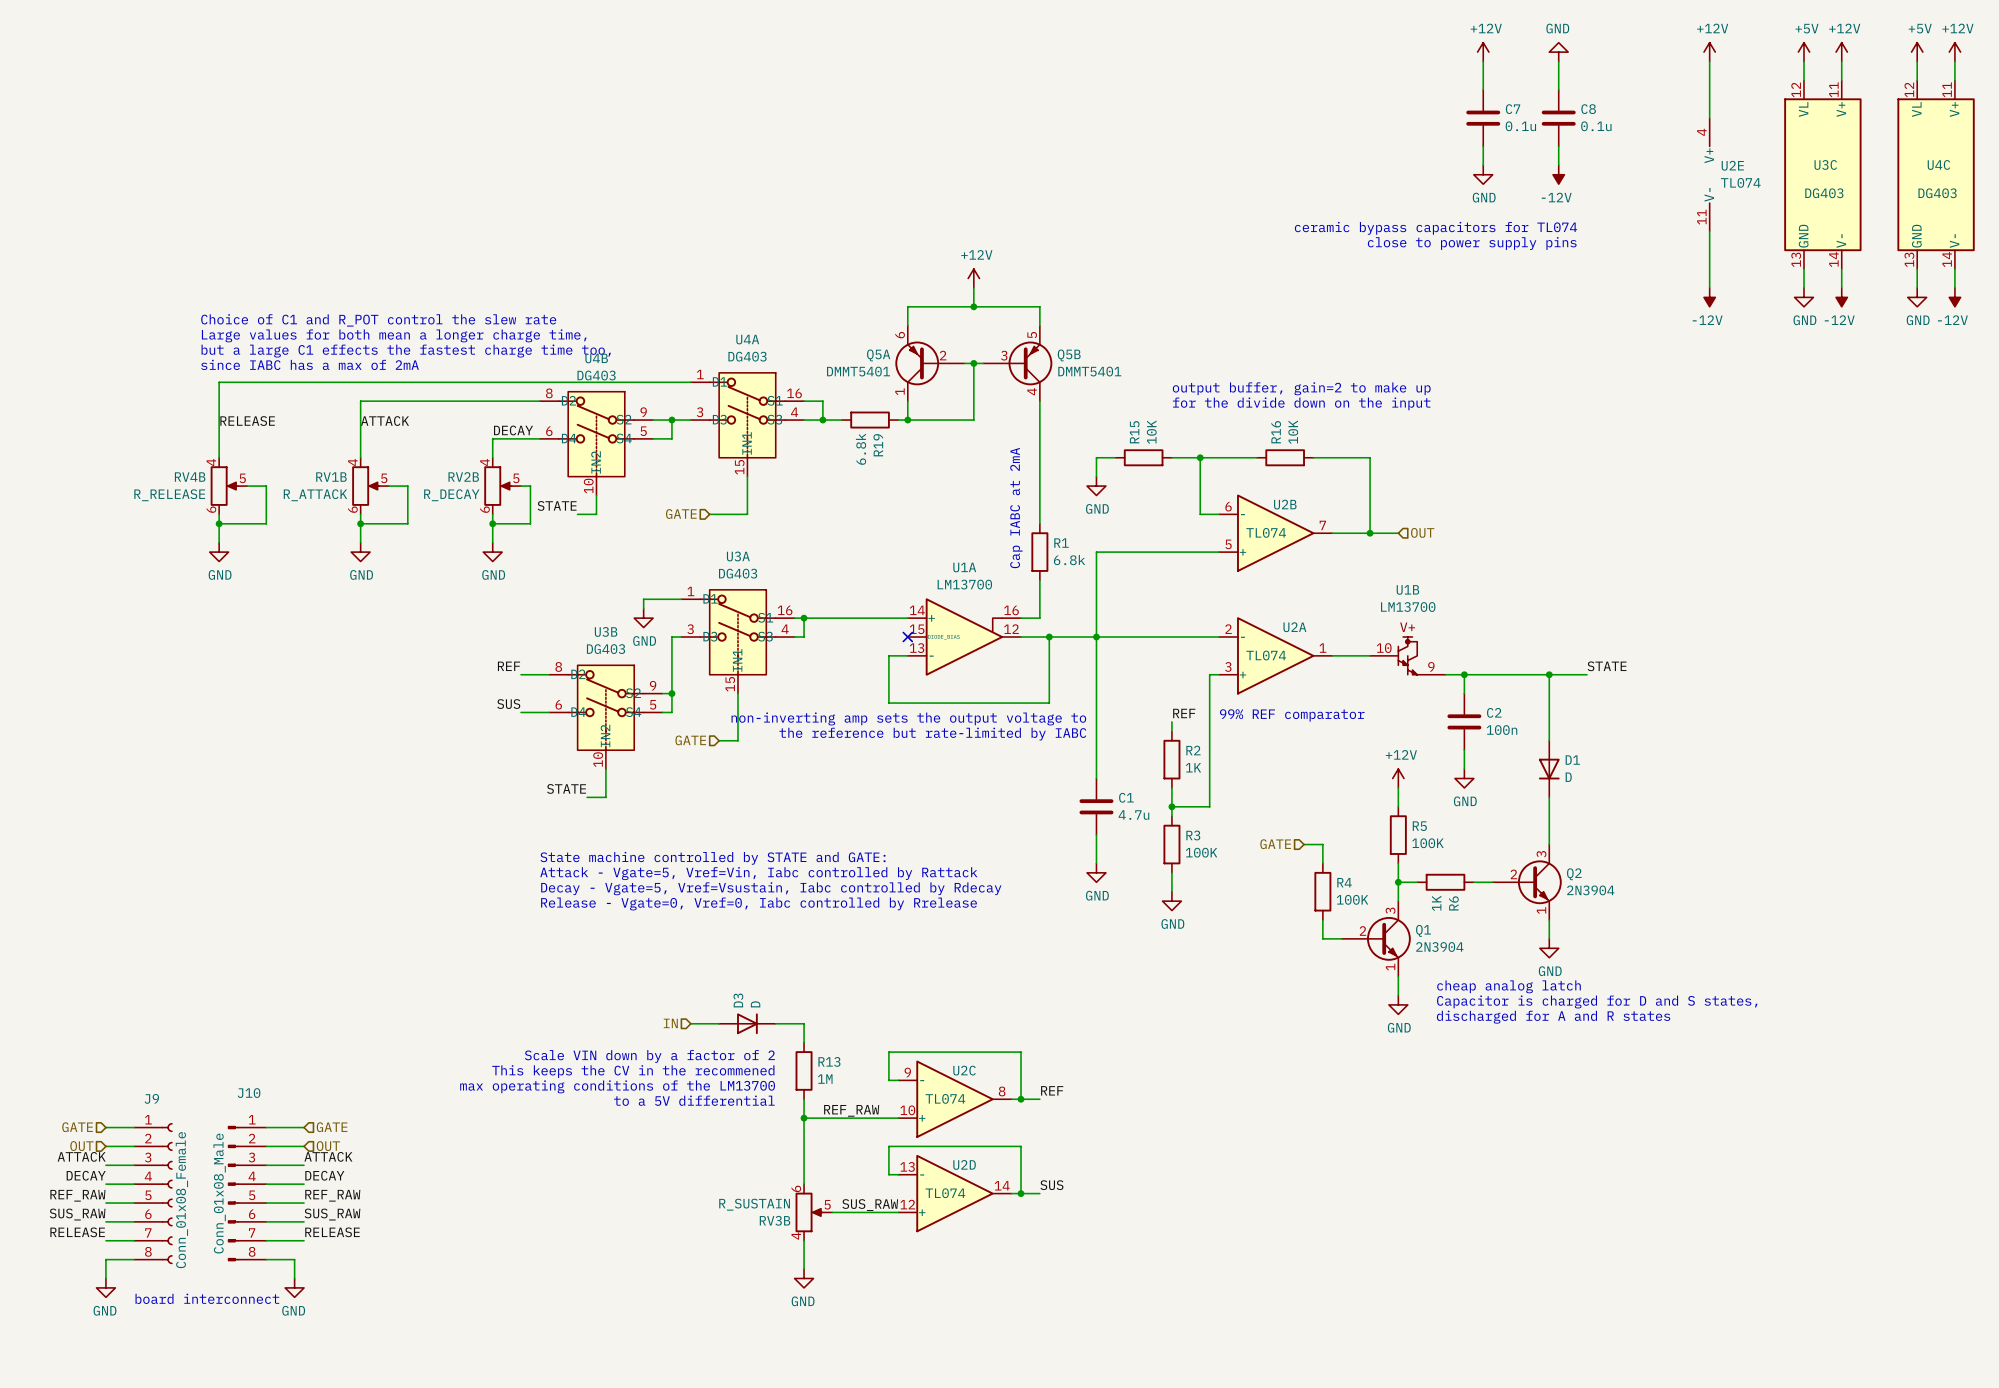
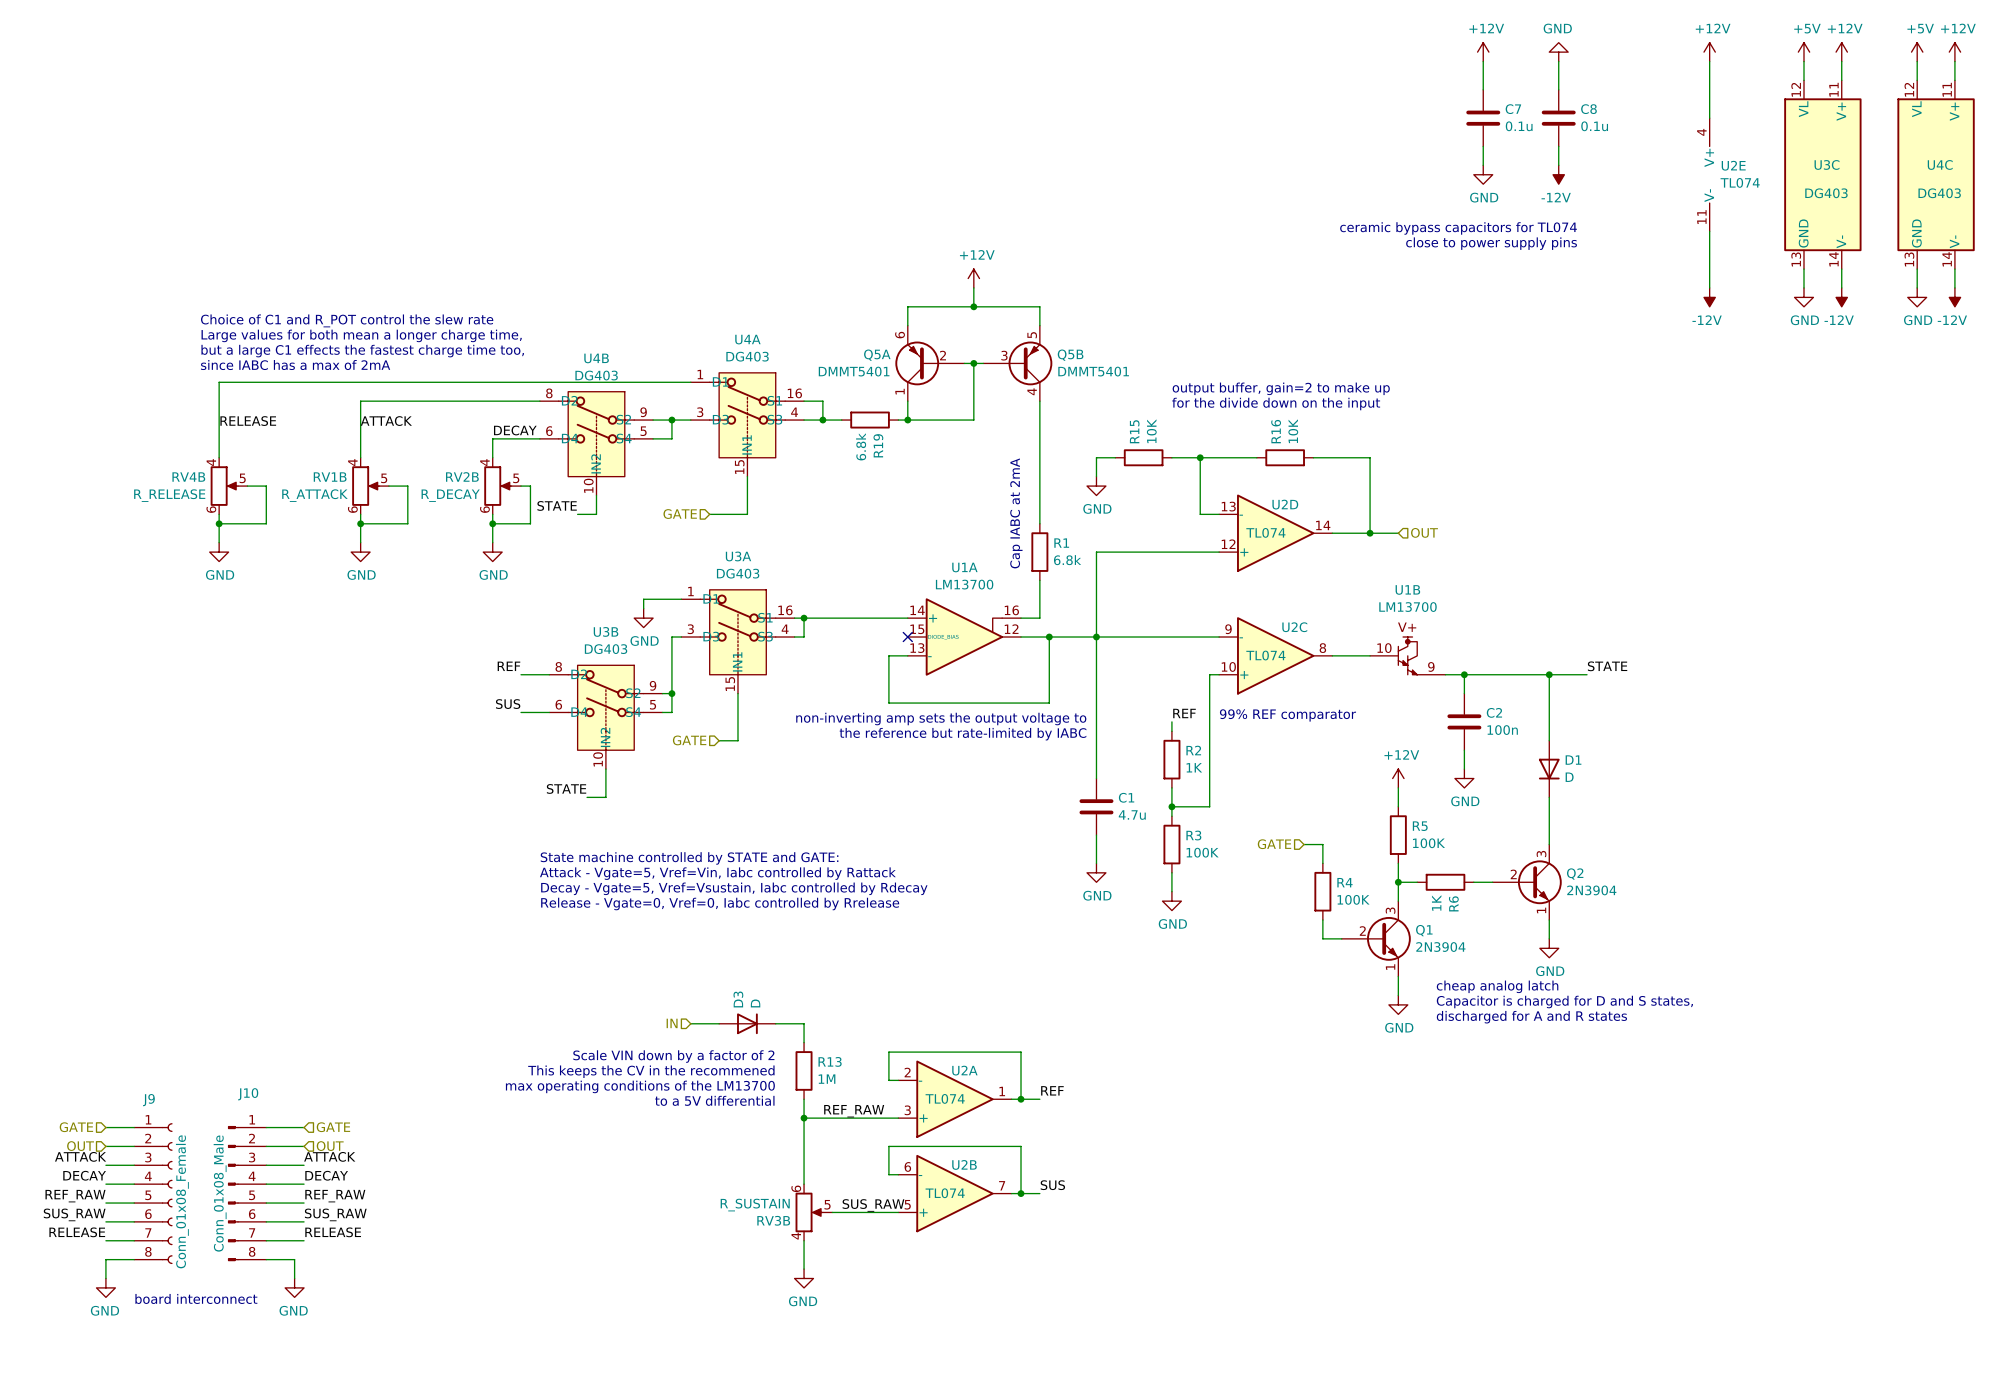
U2B position: (1275, 533) -> (954, 1193)
U2A name position: U2A (1294, 627) -> U2A (964, 1070)
U2A position: (1275, 655) -> (954, 1099)
U2C name position: U2C (964, 1070) -> U2C (1294, 627)
U2C position: (954, 1099) -> (1275, 655)
U2D position: (954, 1193) -> (1275, 533)

